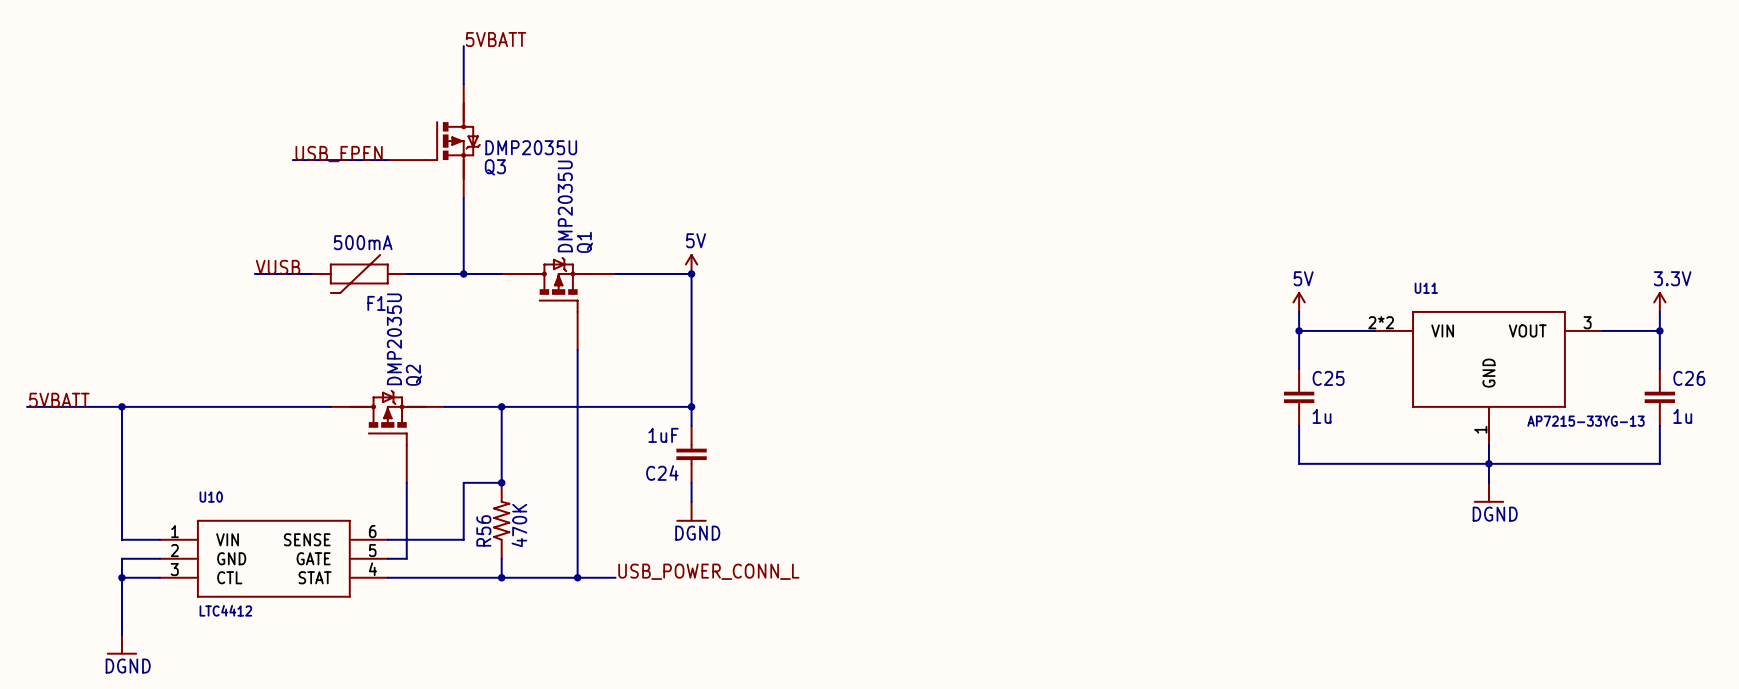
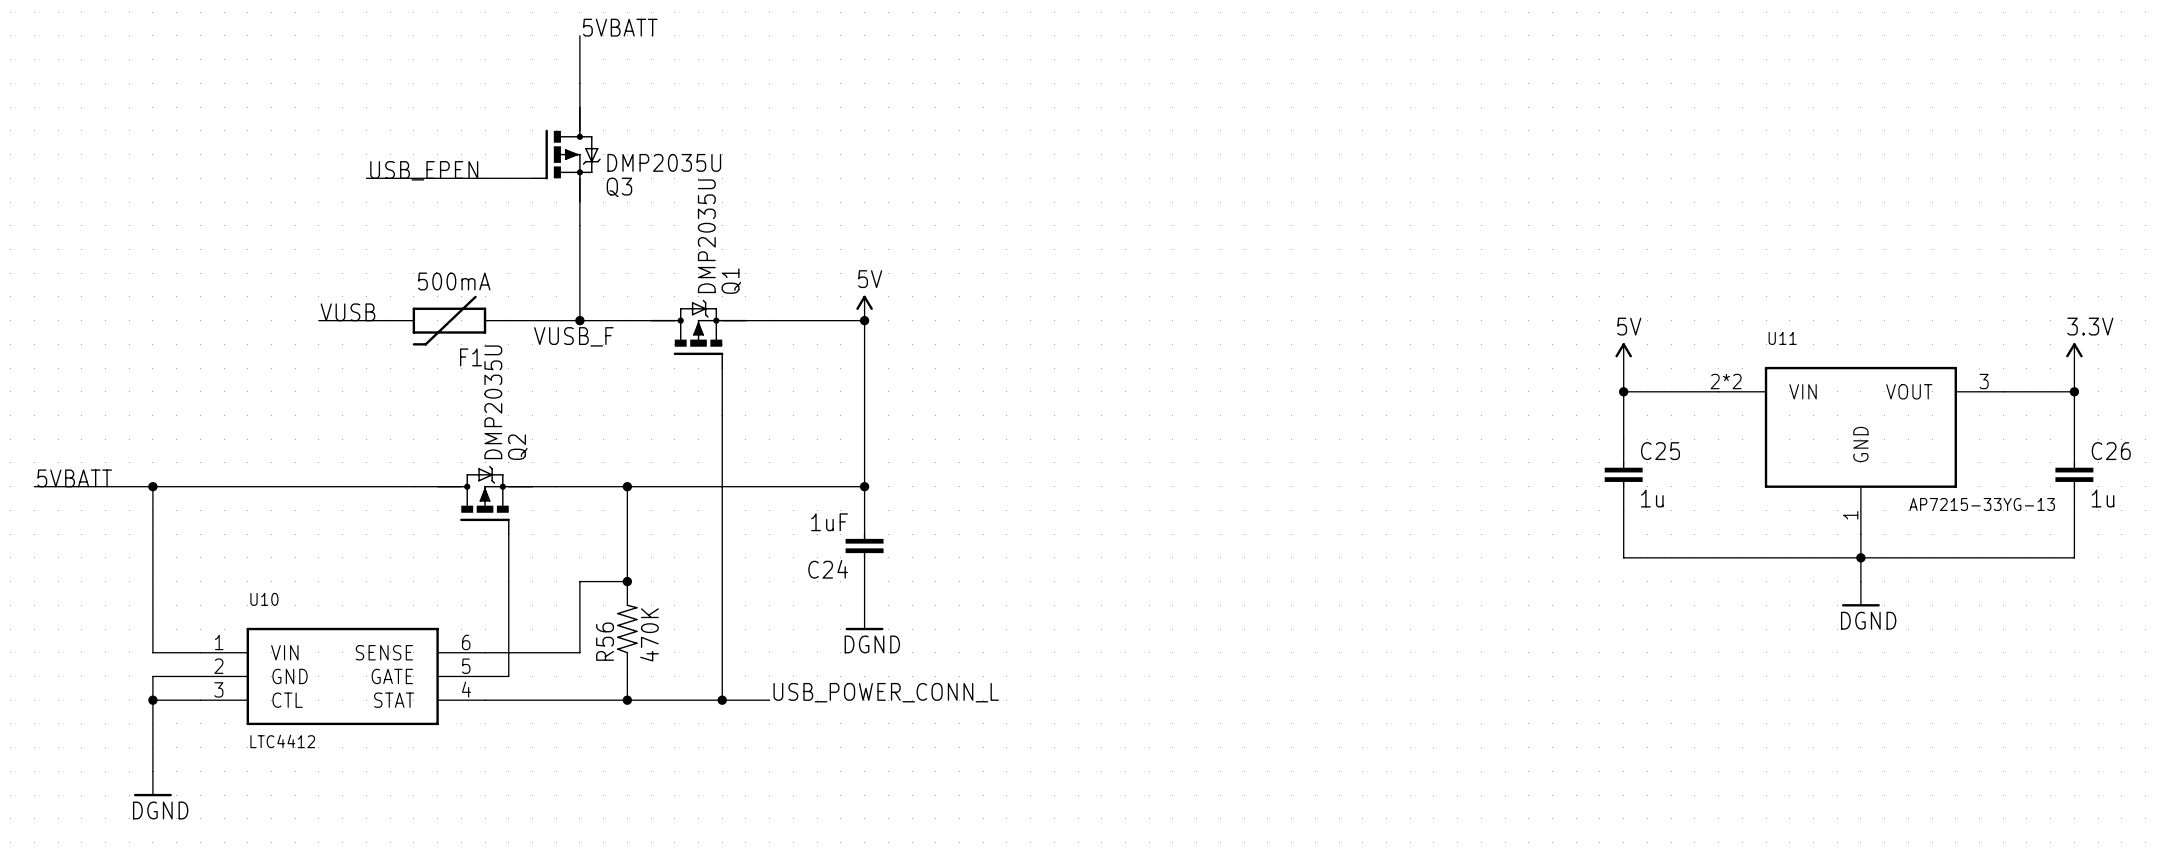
label: none -> VUSB_F (573, 336)

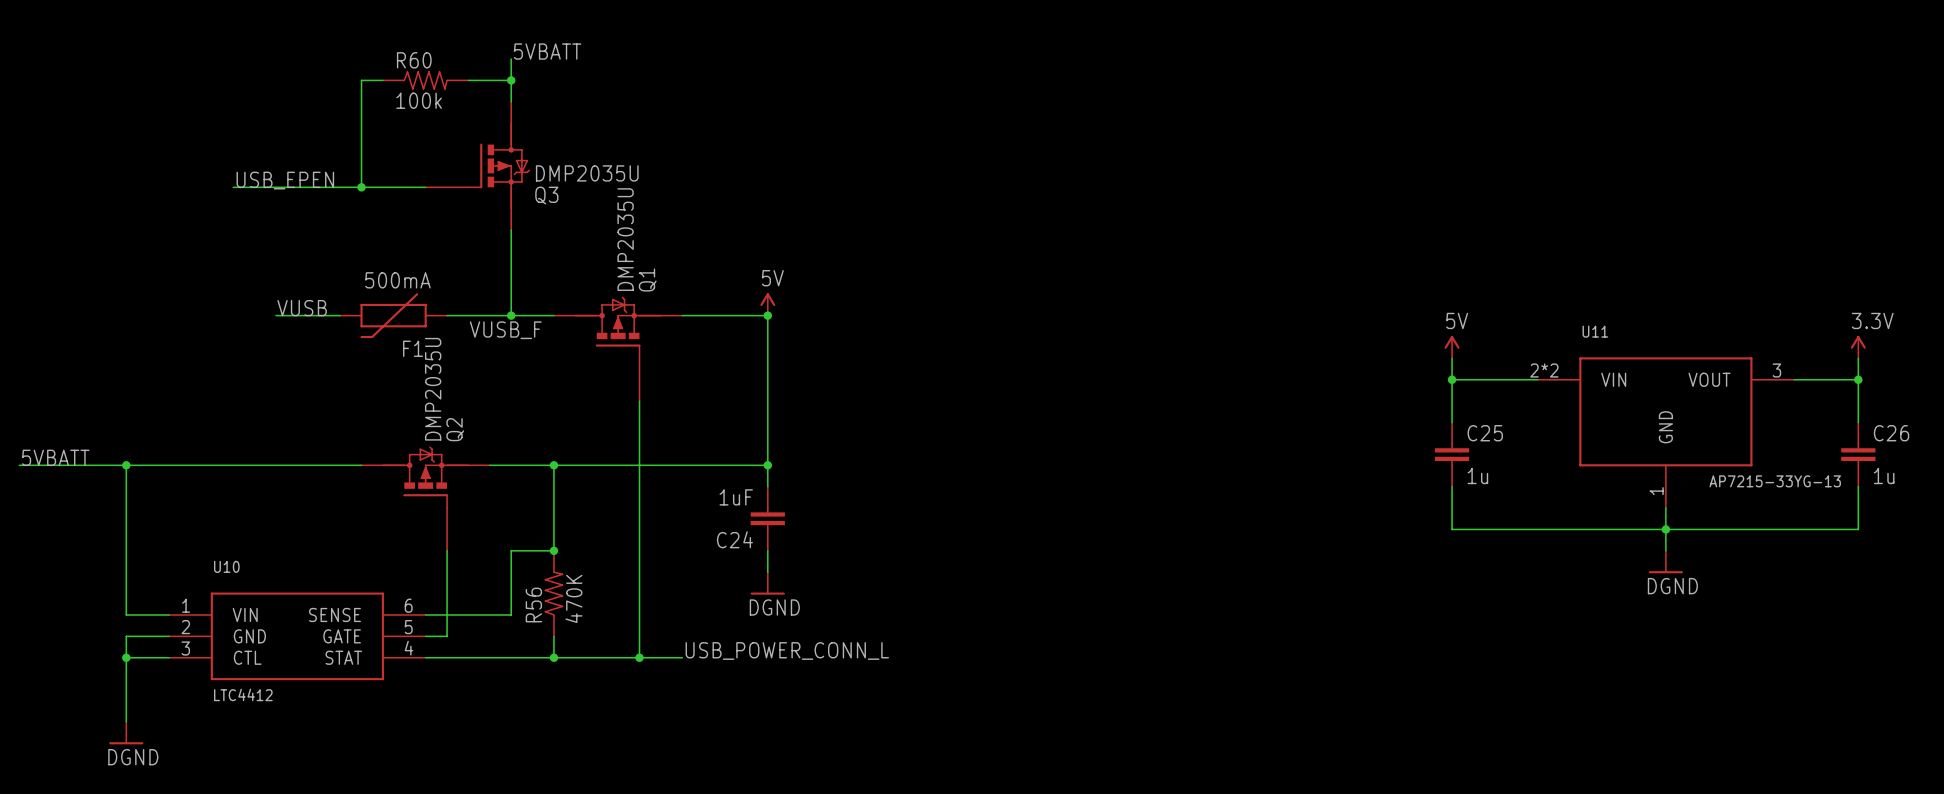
wire: none -> (382, 80) (361, 80) (361, 187)
R60: none -> 100k (425, 80)
wire: none -> (468, 80) (511, 80)
junction: none -> (511, 80)
label position: USB_EPEN (424, 170) -> USB_EPEN (285, 180)
wire: none -> (233, 187) (318, 187)
junction: none -> (361, 187)

